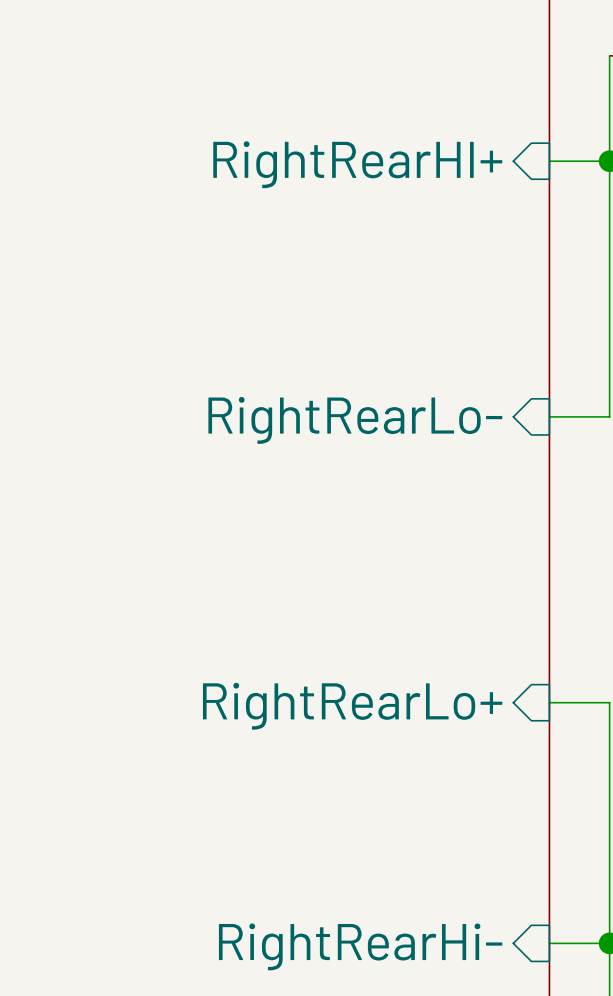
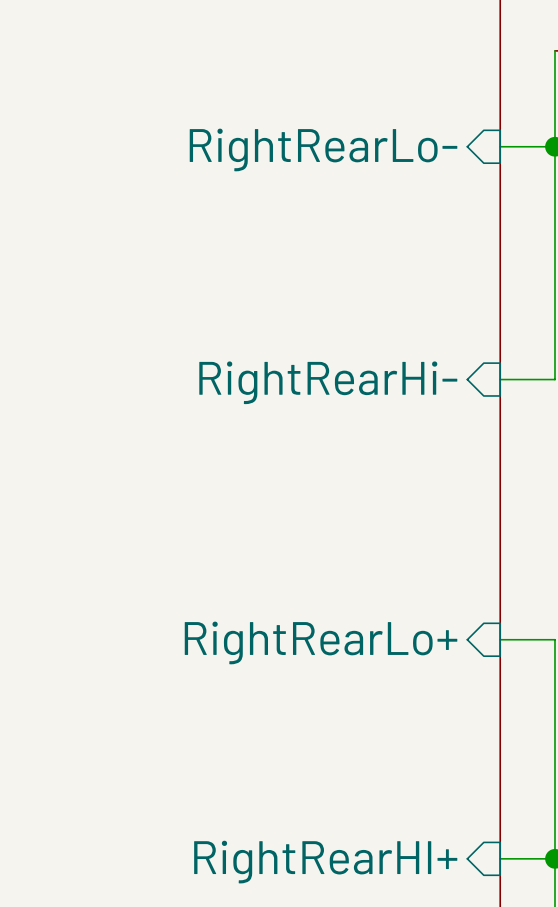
sheet pin: RightRearHI+ (357, 164) -> RightRearLo- (323, 149)
sheet pin: RightRearLo- (355, 420) -> RightRearHi- (328, 382)
sheet pin: RightRearHi- (360, 946) -> RightRearHI+ (325, 862)

